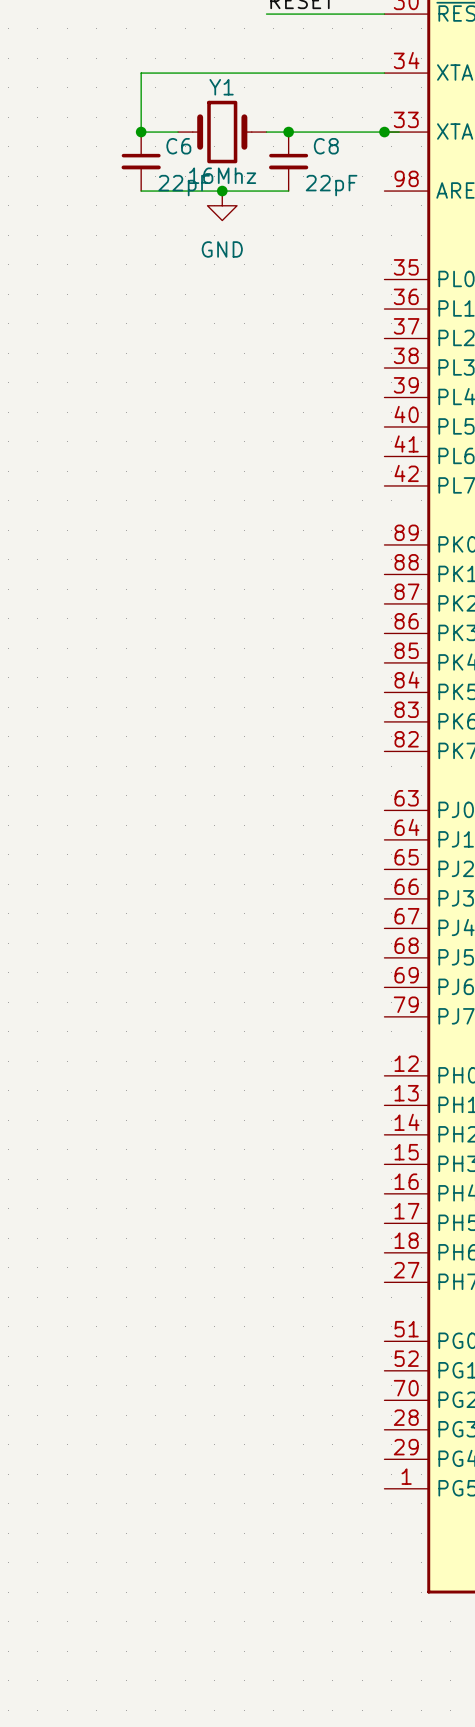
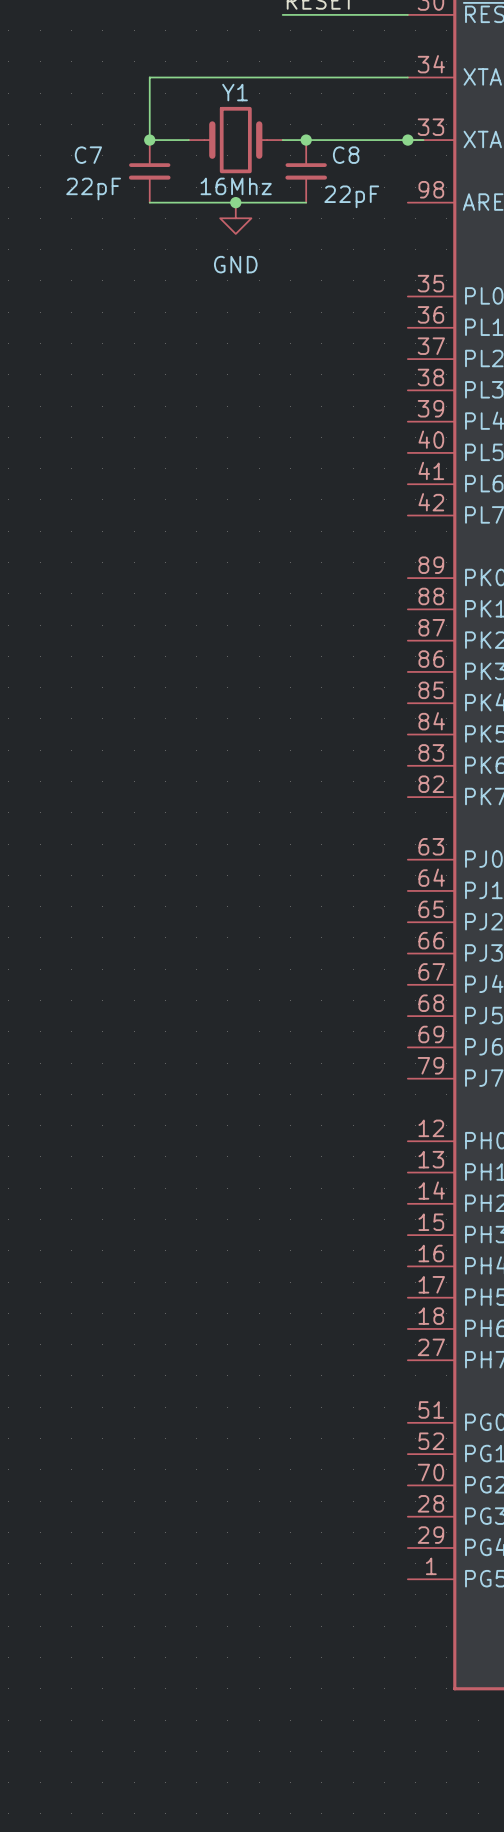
C6 name: C6 (178, 146) -> C7 (88, 155)
C6 value position: 22pF (184, 185) -> 22pF (93, 189)

